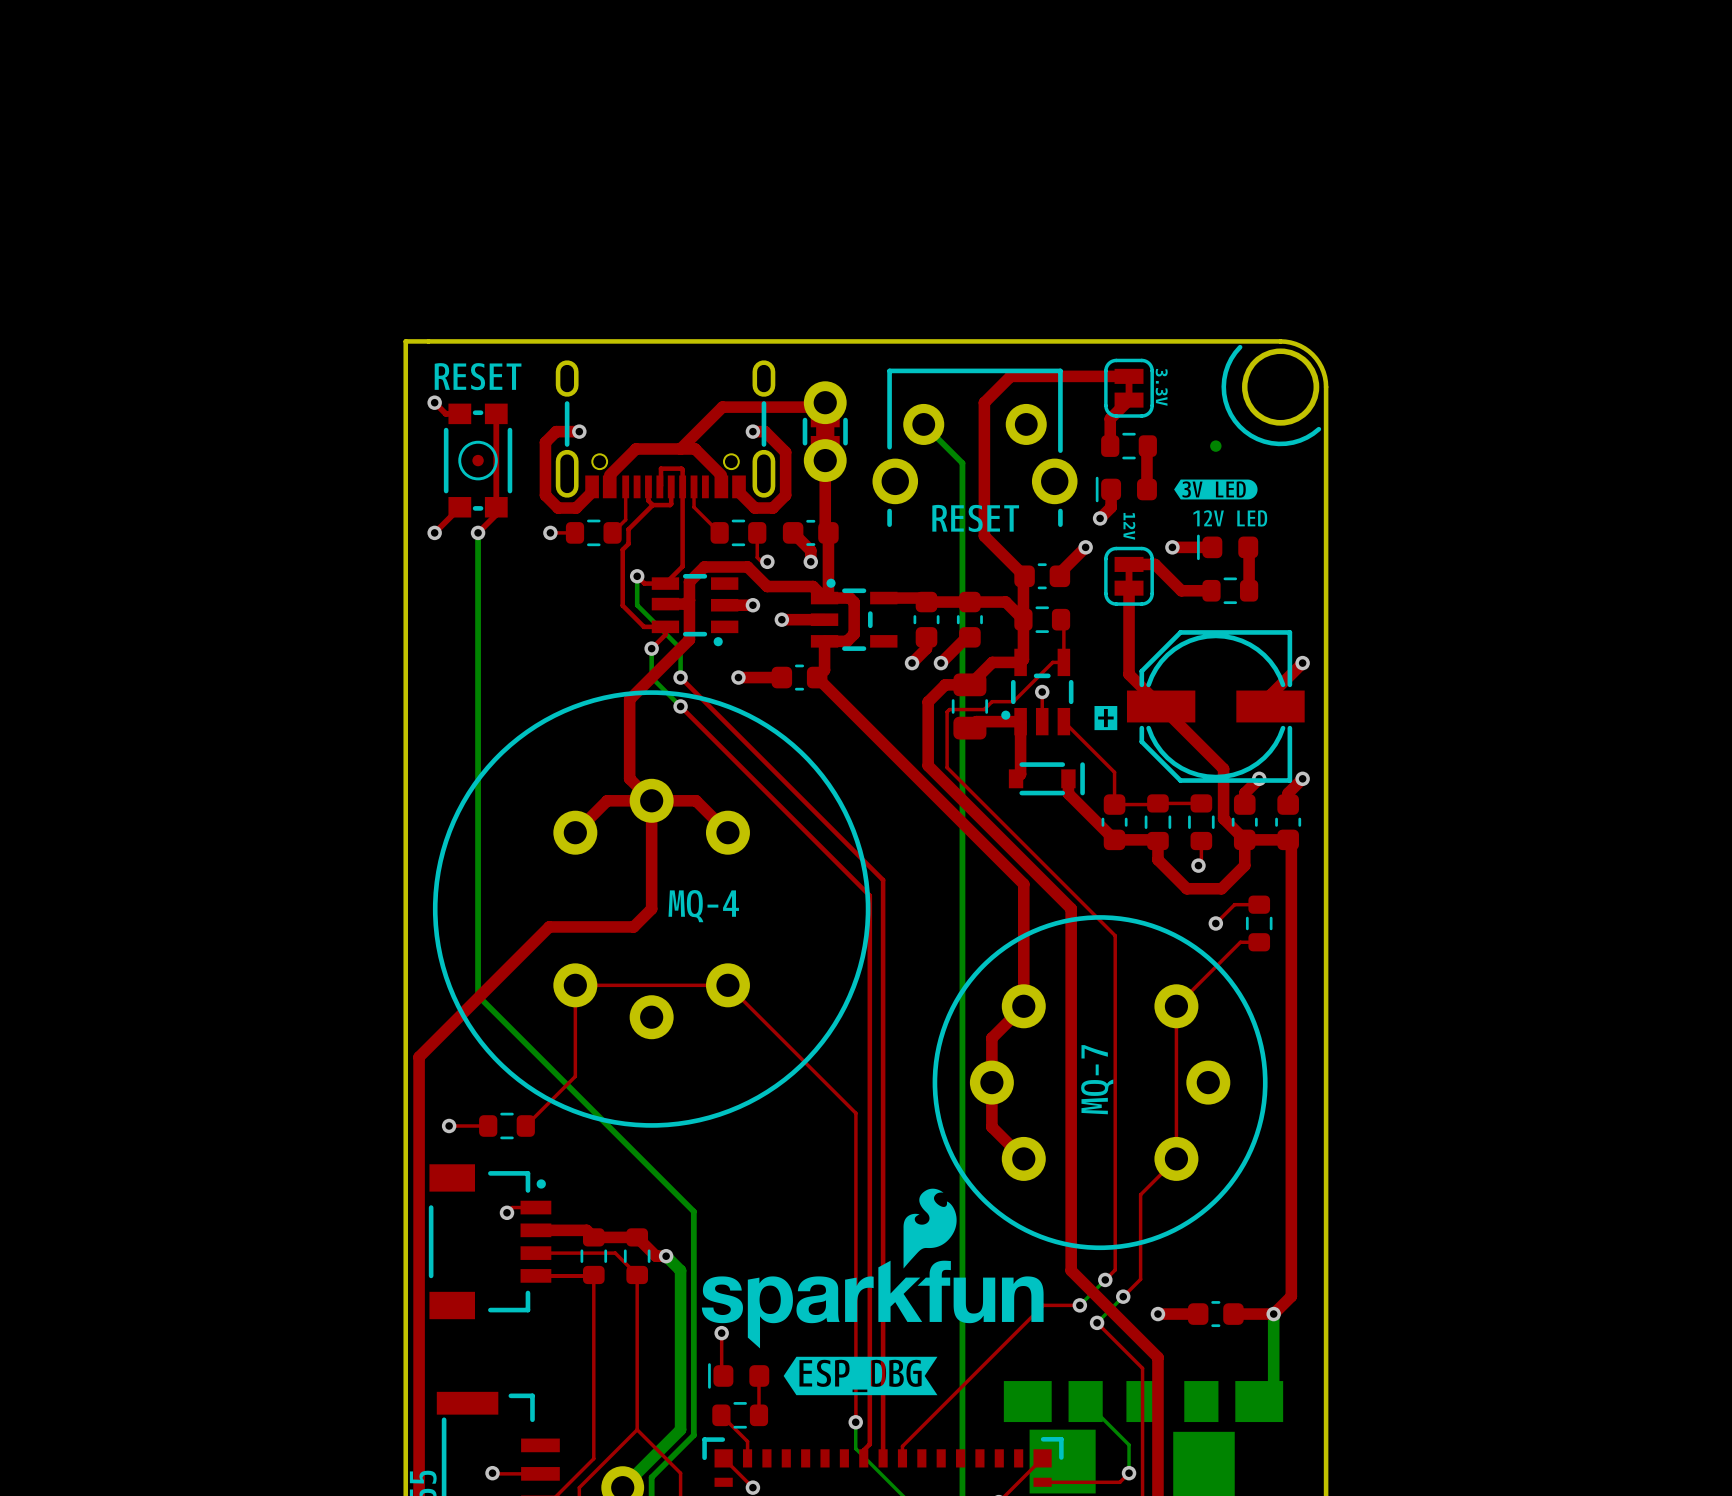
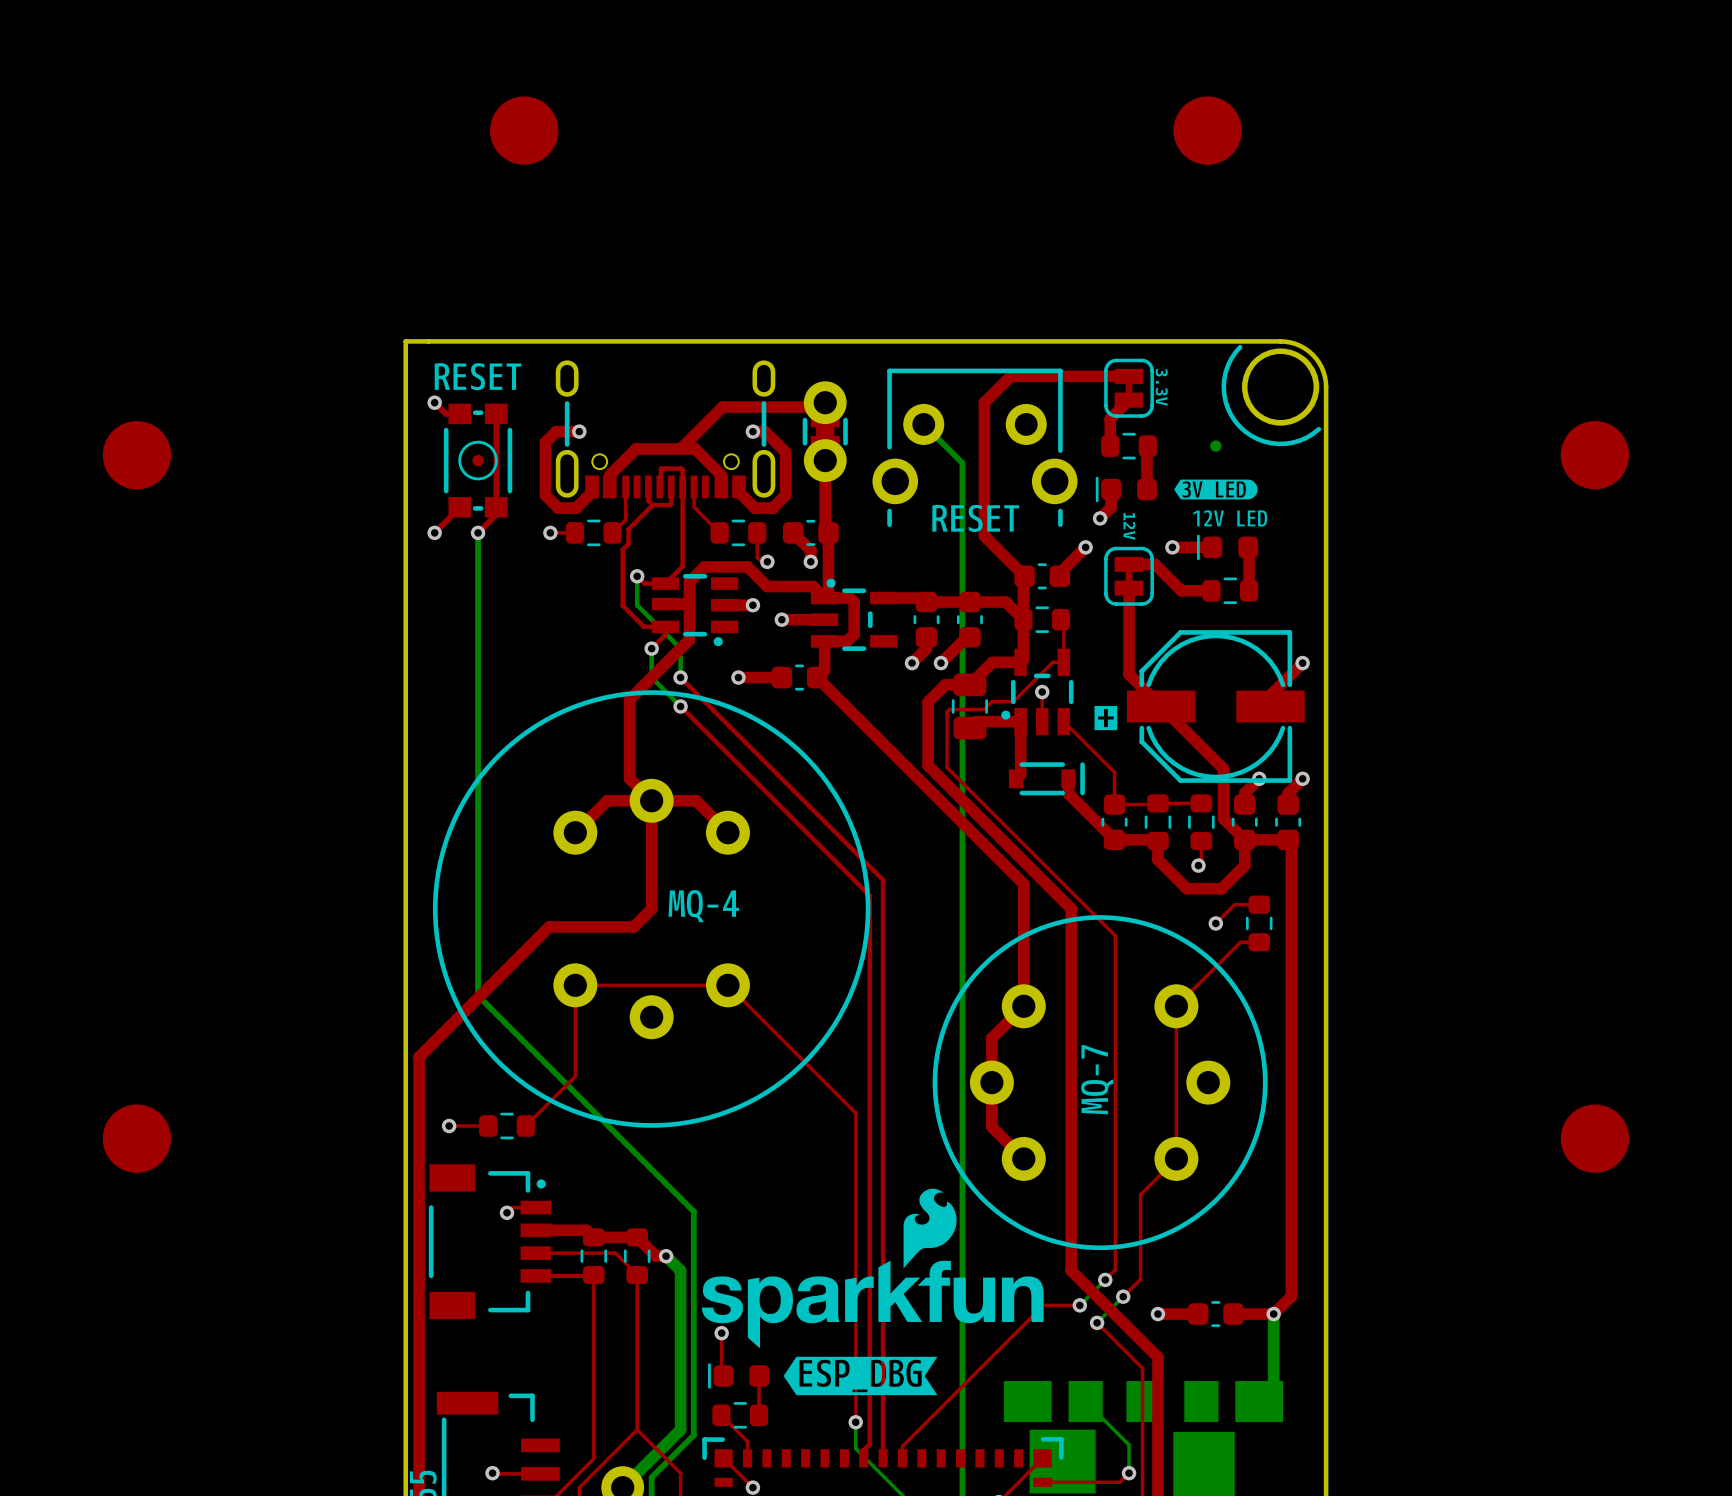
part: none -> (524, 130)
part: none -> (1207, 130)
part: none -> (136, 455)
part: none -> (1594, 455)
part: none -> (136, 1138)
part: none -> (1594, 1138)

